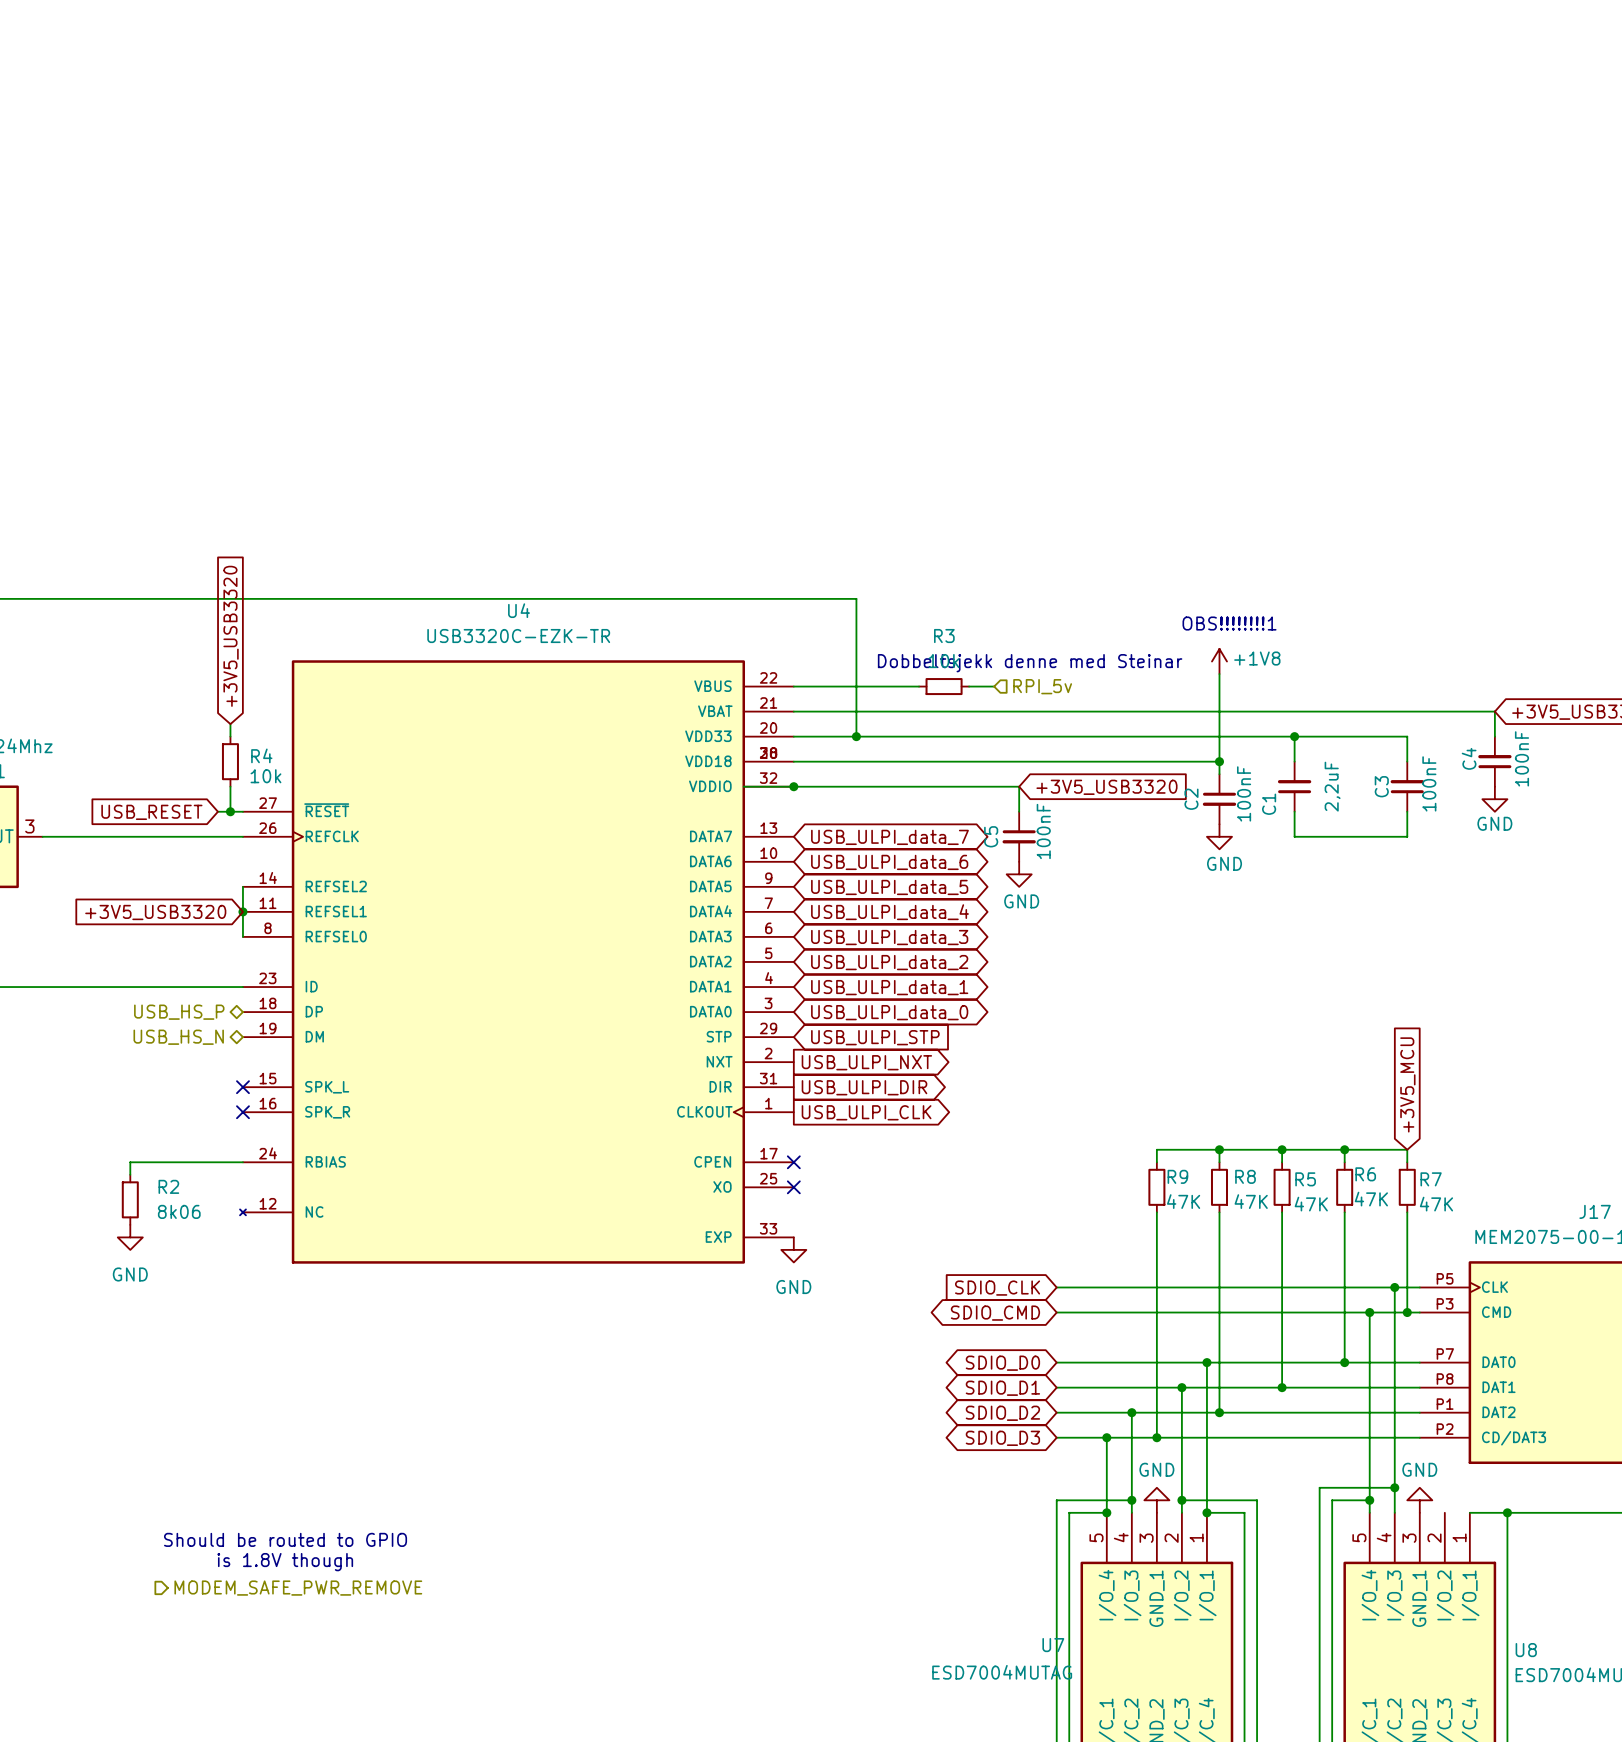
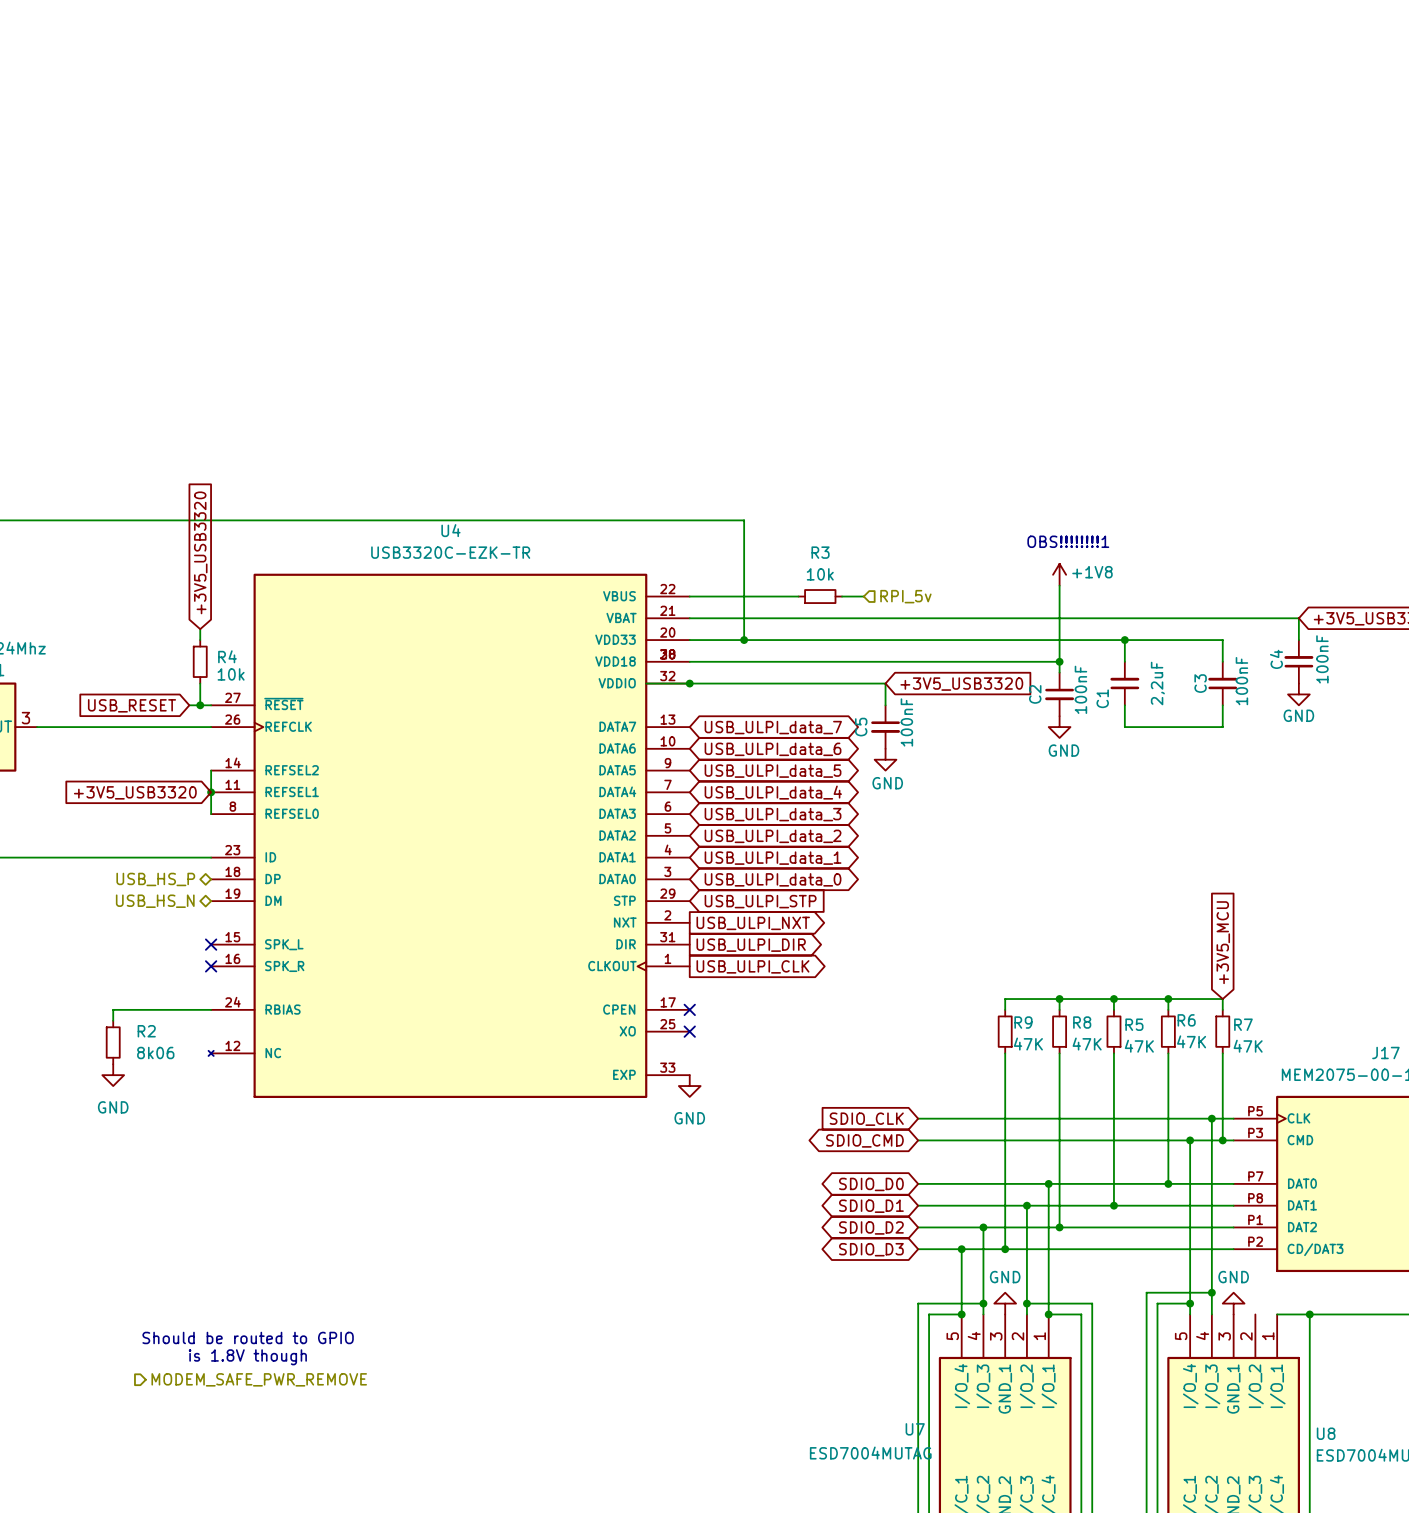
text: Dobbeltsjekk denne med Steinar (1030, 663) -> none

